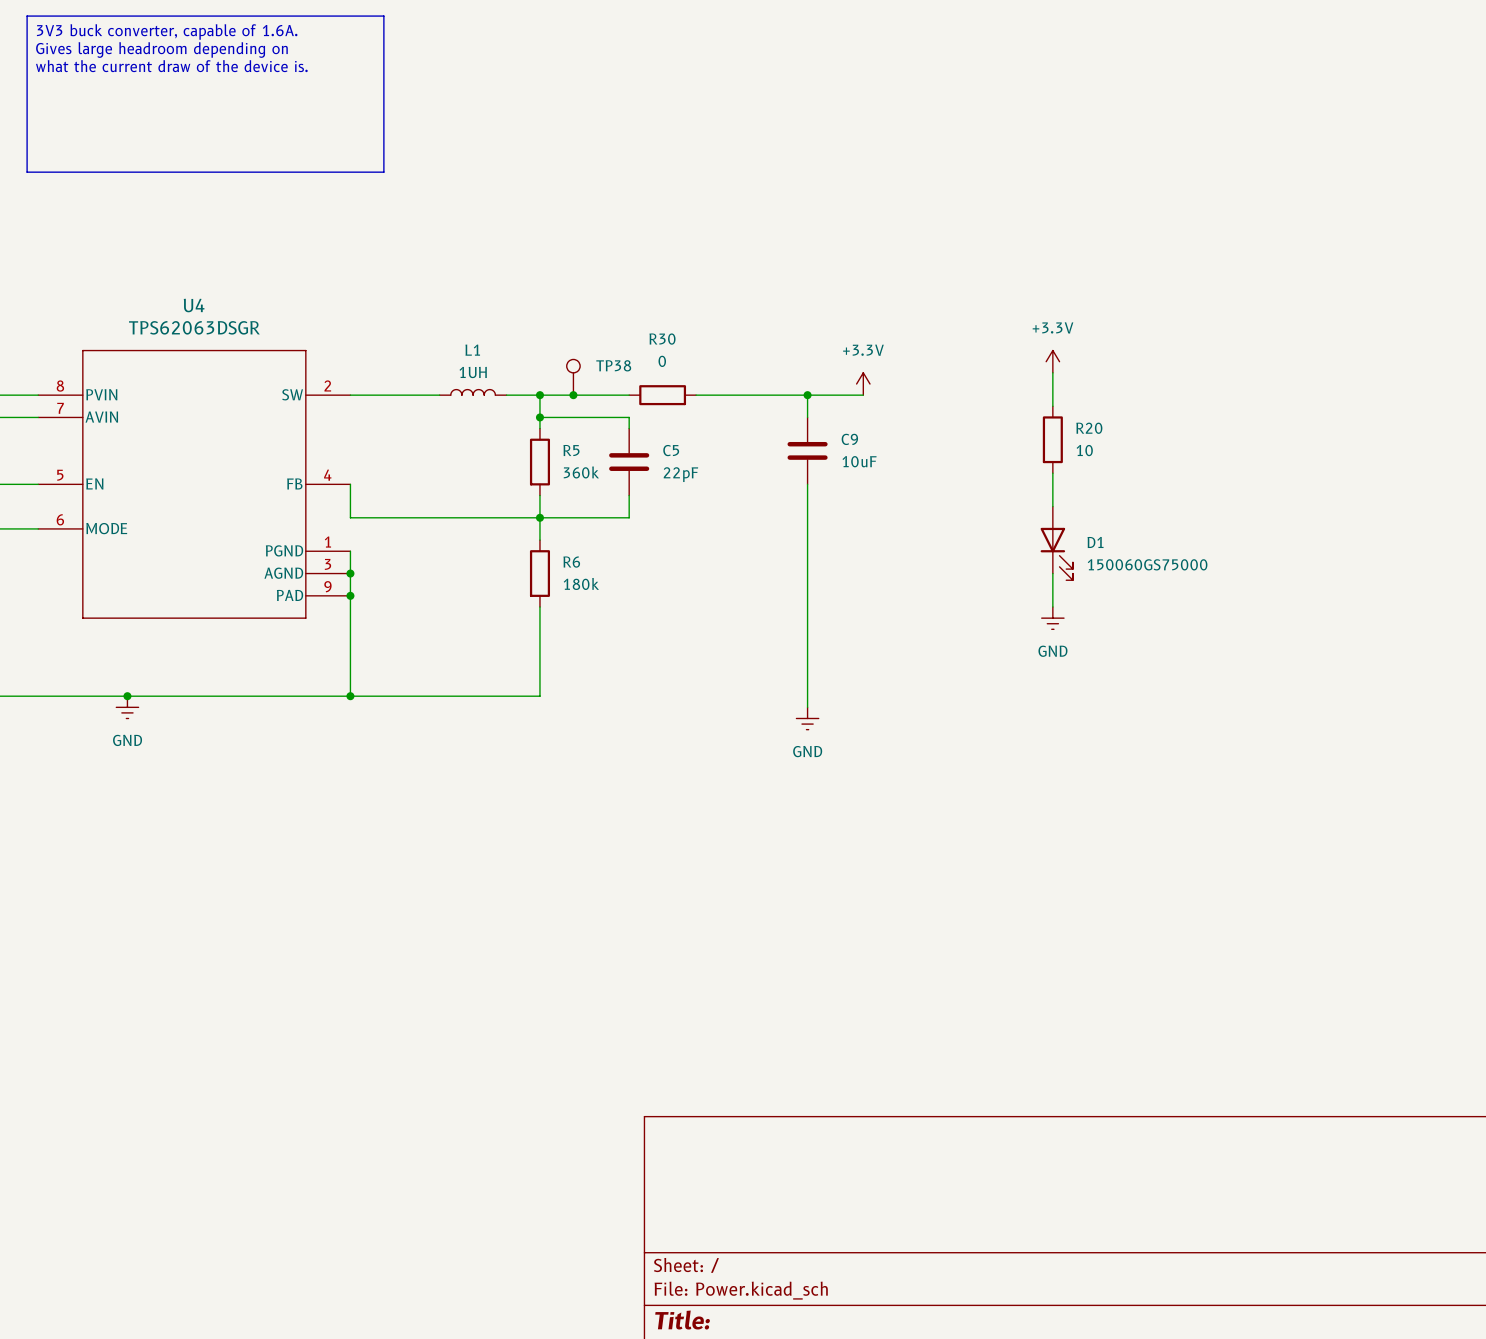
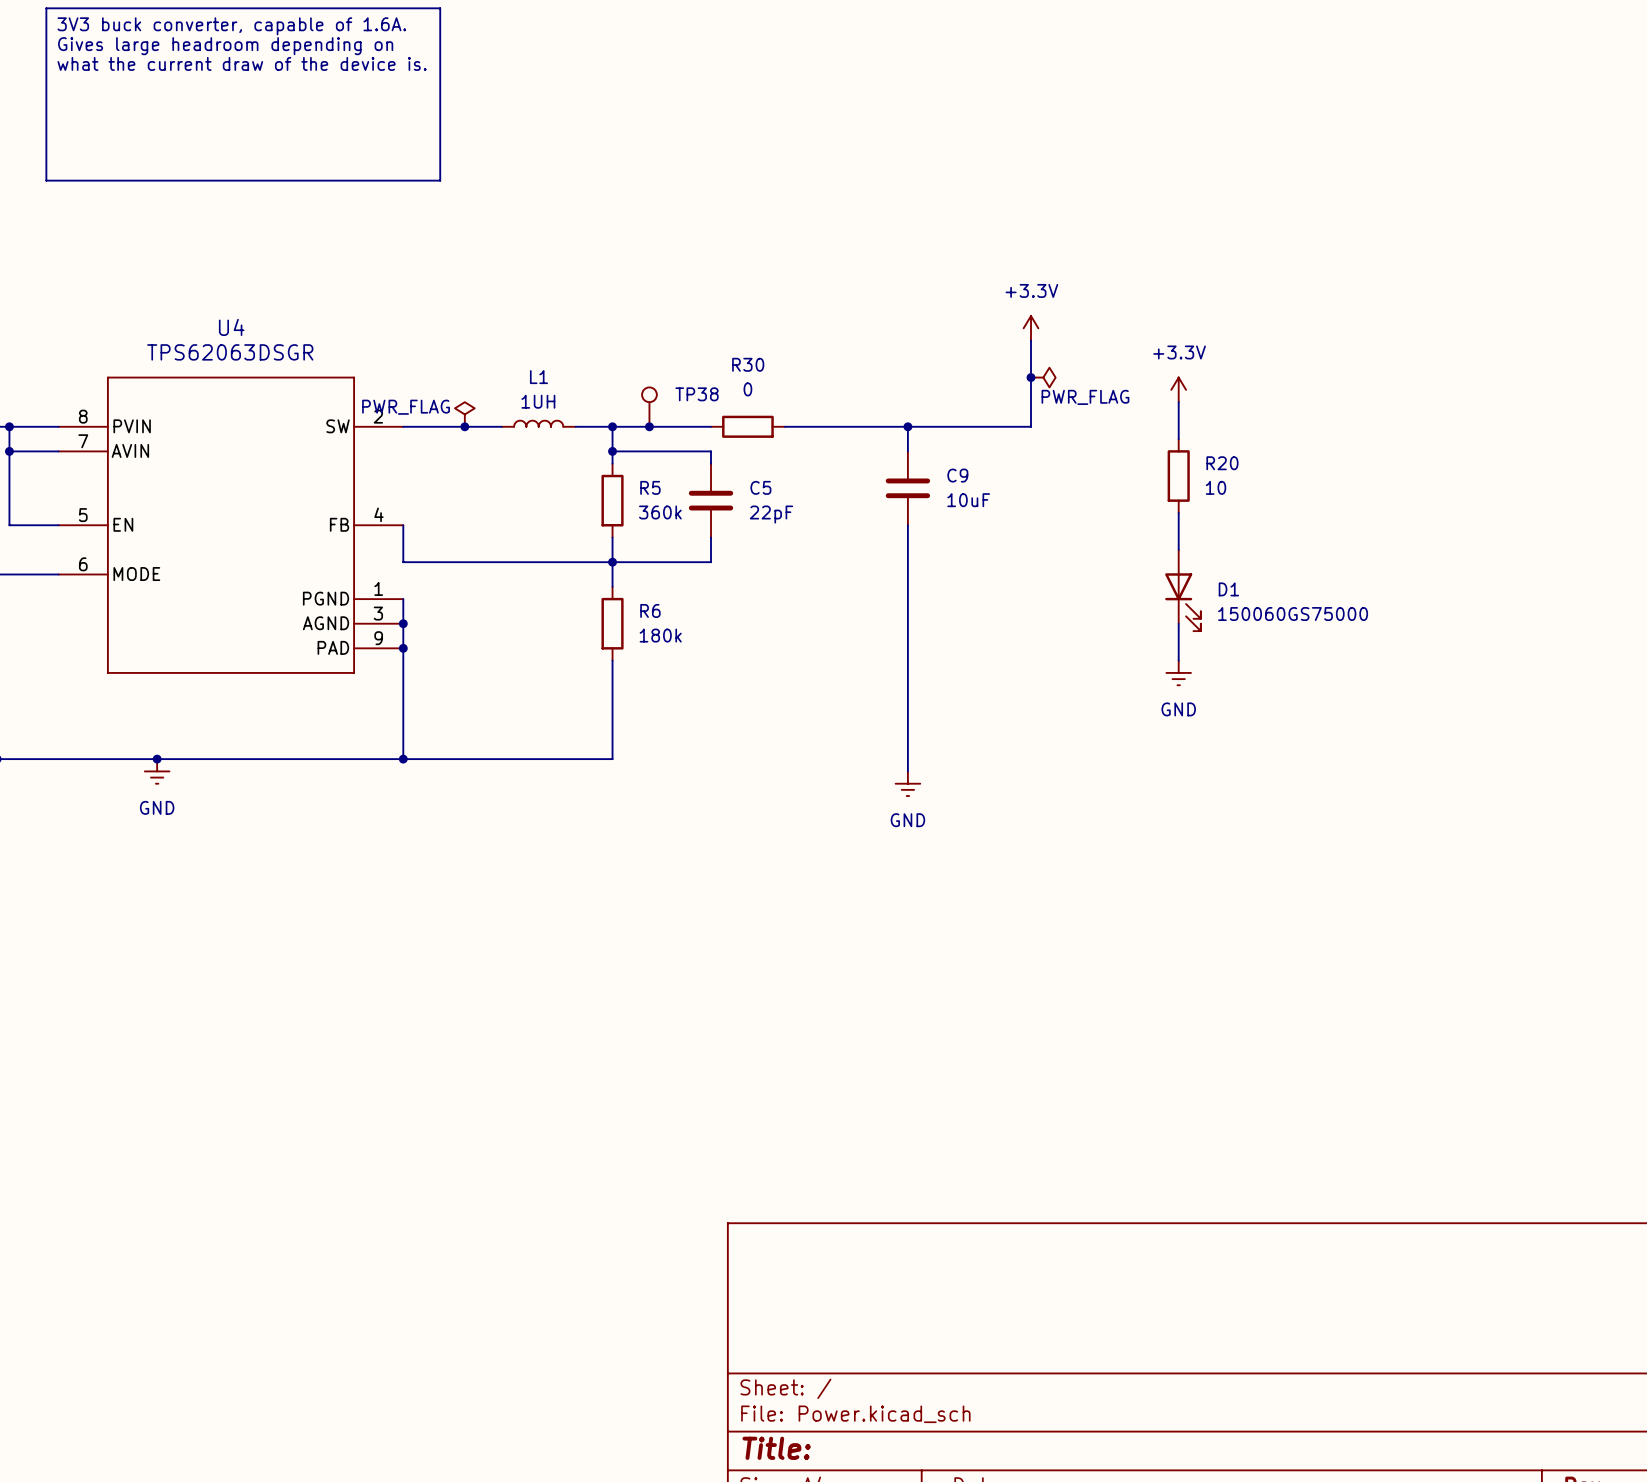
wire: none -> (1031, 340) (1031, 426) (969, 426)
junction: none -> (1031, 377)
power symbol: none -> PWR_FLAG (1043, 377)
power symbol: none -> PWR_FLAG (464, 414)
power symbol position: +3.3V (863, 384) -> +3.3V (1031, 328)
junction: none -> (464, 426)

